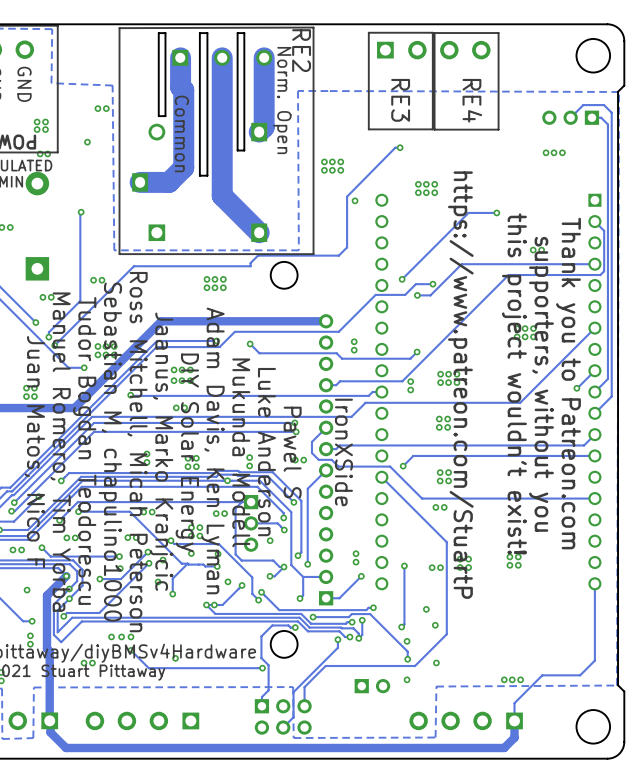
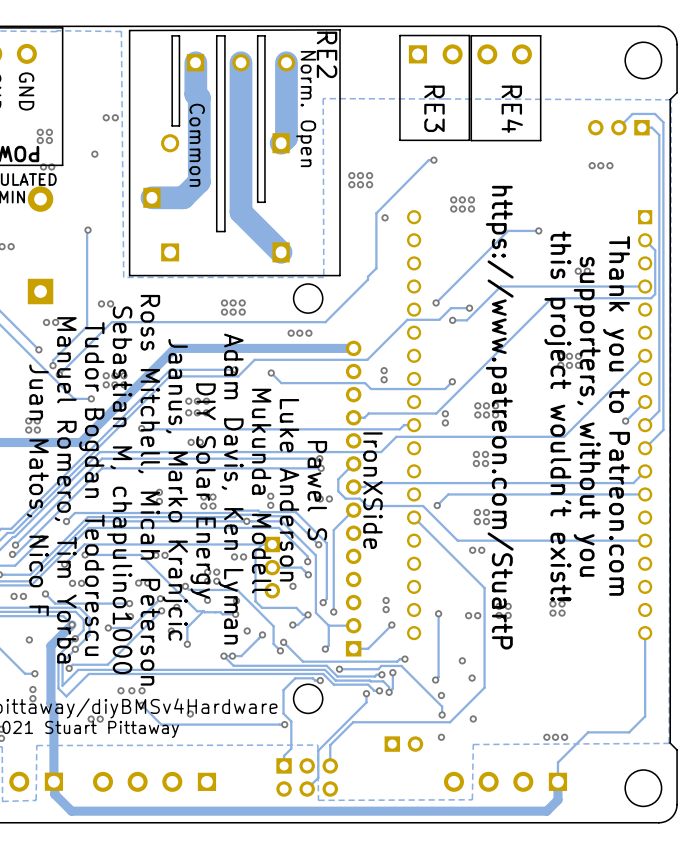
zone outline: (52, 29) (51, 83) (112, 85) (114, 250) (298, 250) (298, 90) -> (56, 31) (121, 31) (123, 277) (323, 277) (323, 98)
board edge: (244, 150) (237, 150) -> (264, 163) (264, 202) (257, 202) (257, 163)
board edge: (207, 175) (199, 175) -> (224, 190) (224, 231) (216, 231) (216, 190)
track: (339, 255) (258, 255) (250, 263) (250, 266) (133, 266) (103, 297) -> (368, 276) (368, 279) (325, 322) (111, 322)
via: none -> (291, 333)
via: none -> (299, 333)
via: none -> (308, 333)

